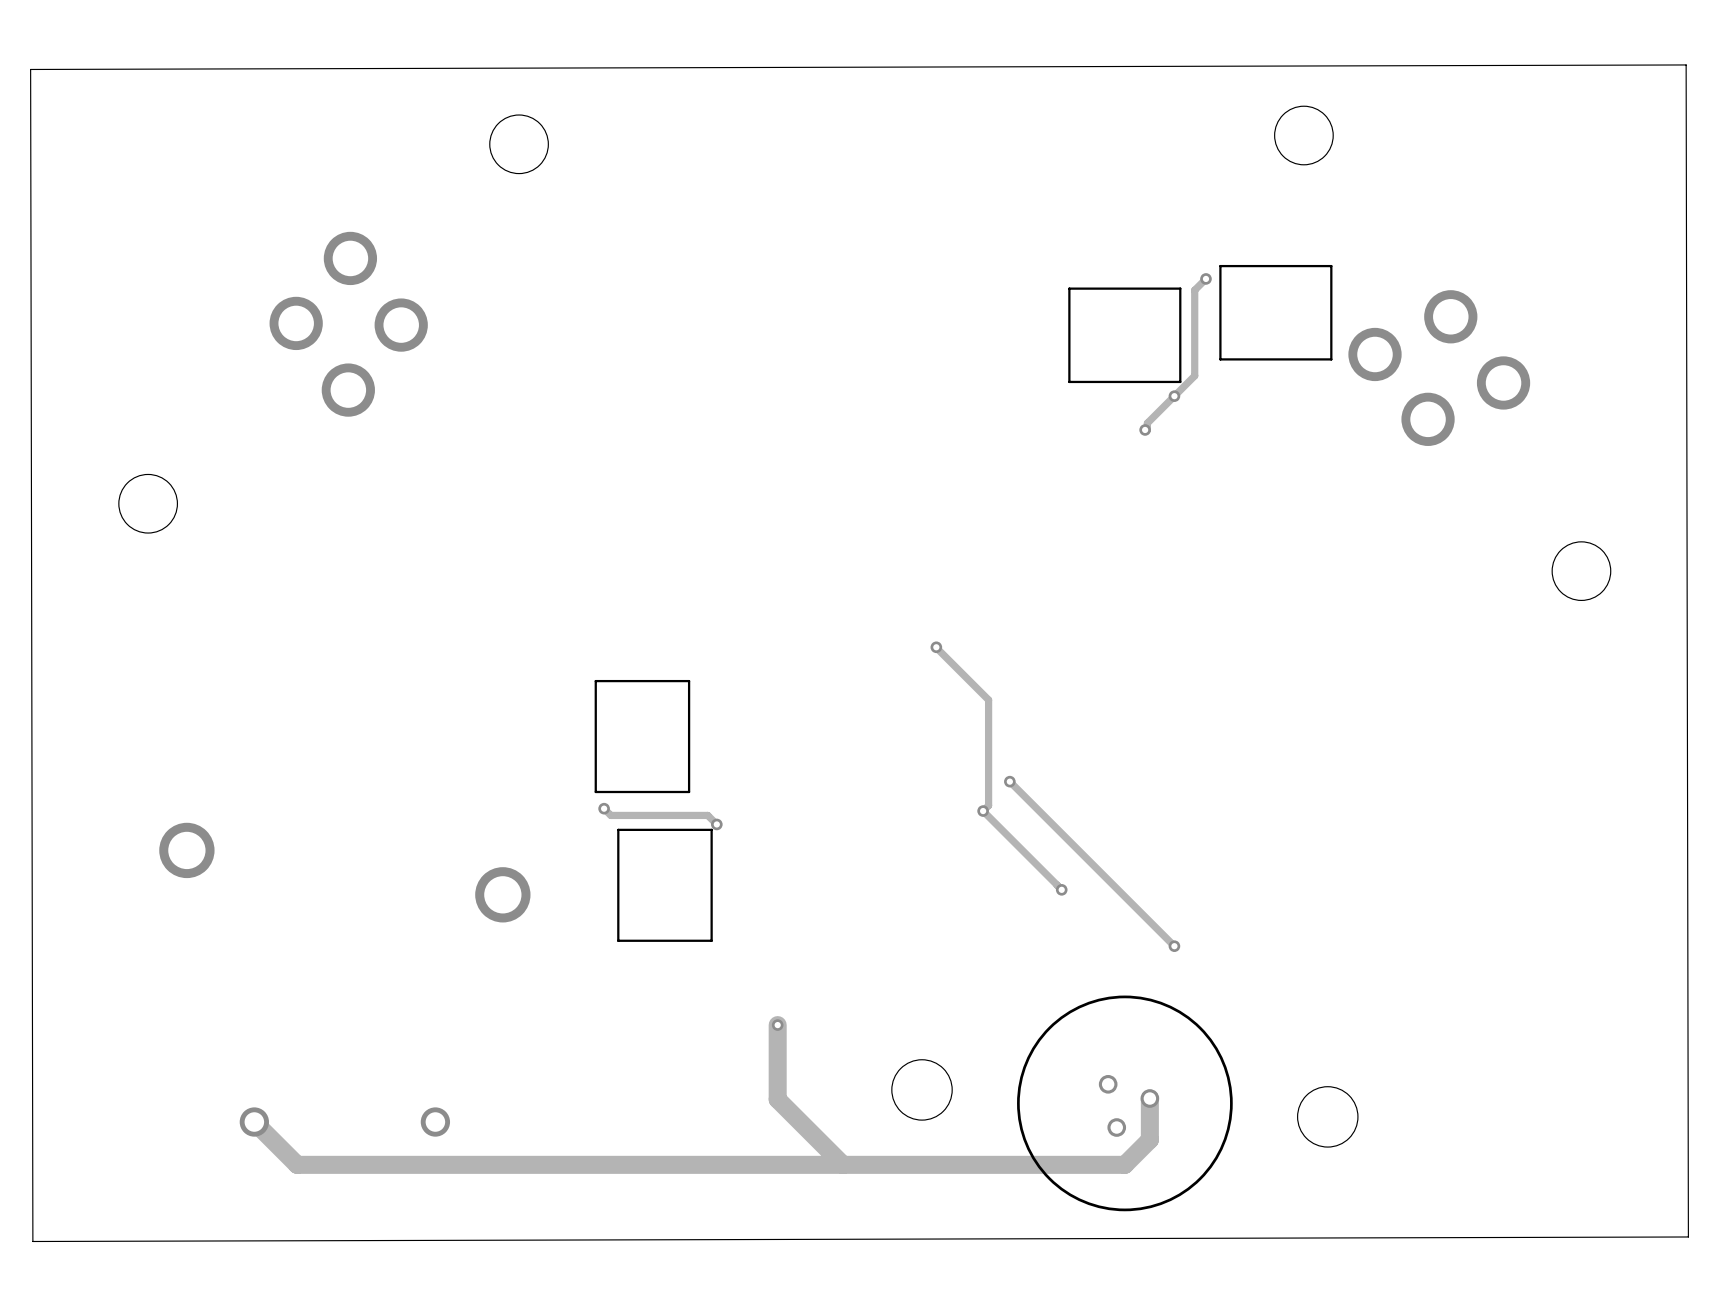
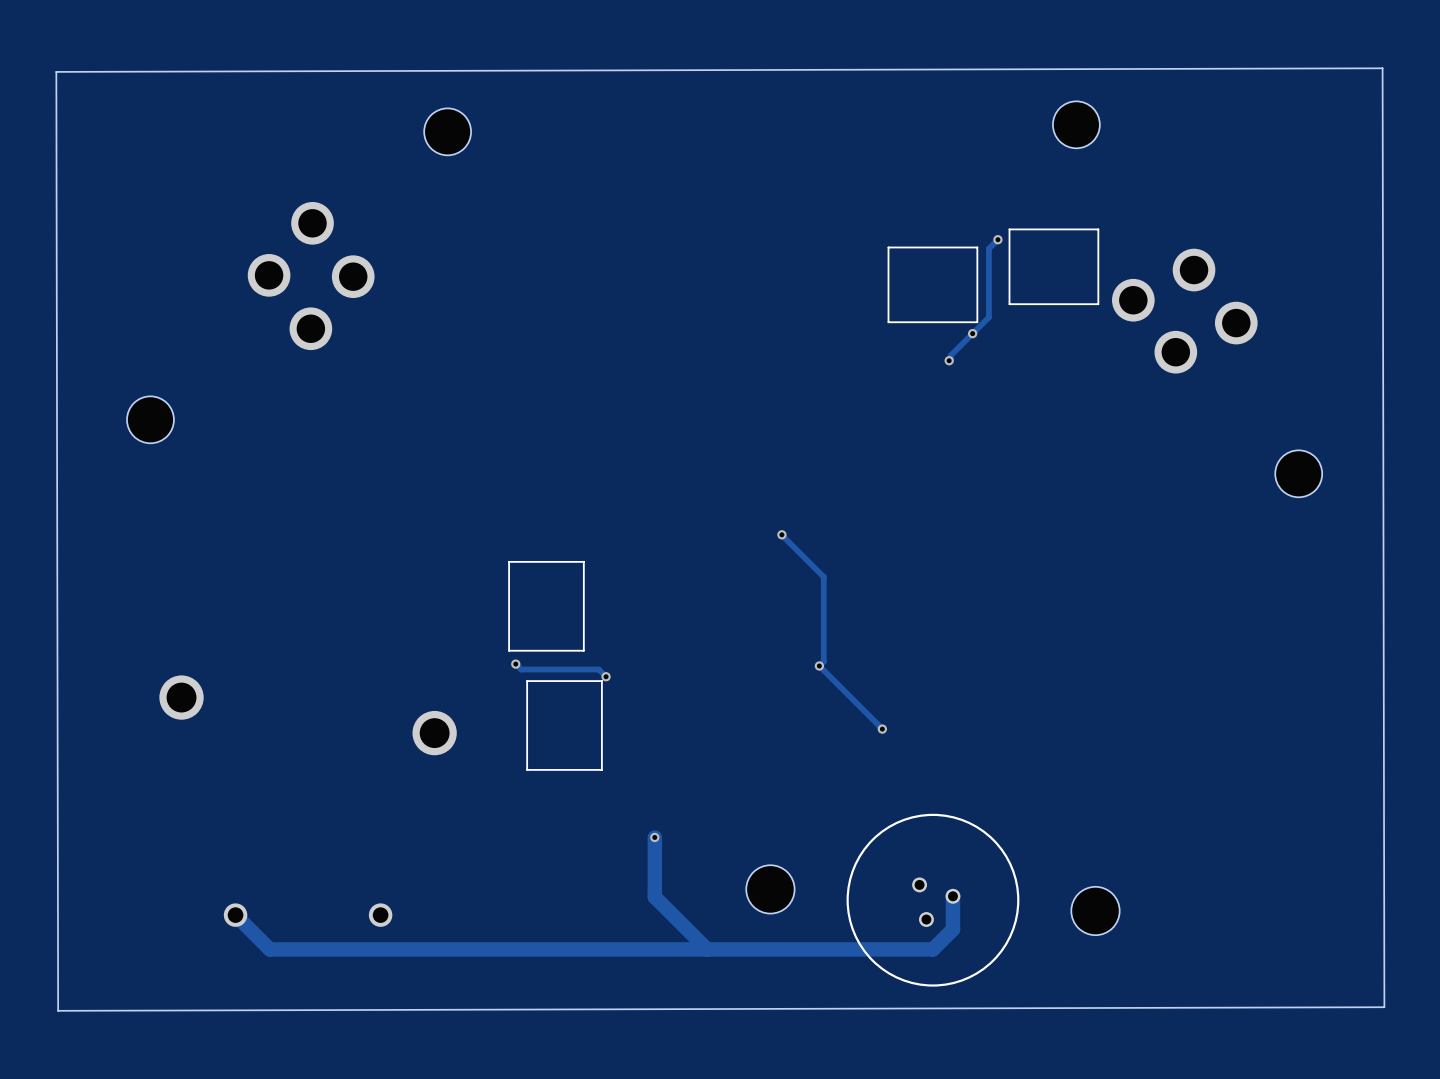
track: (1009, 781) (1174, 946) -> none
via: (1009, 781) -> none
via: (1174, 946) -> none

